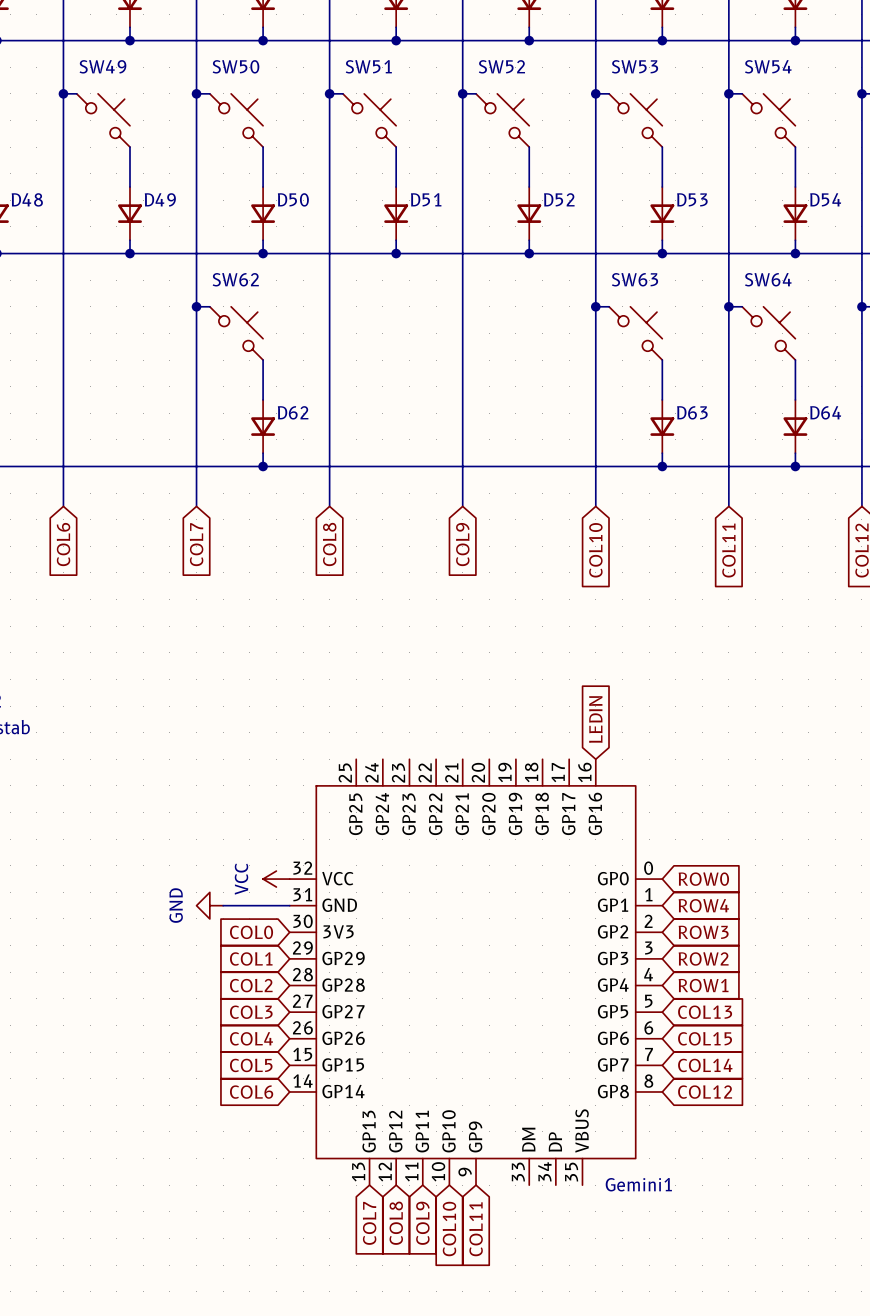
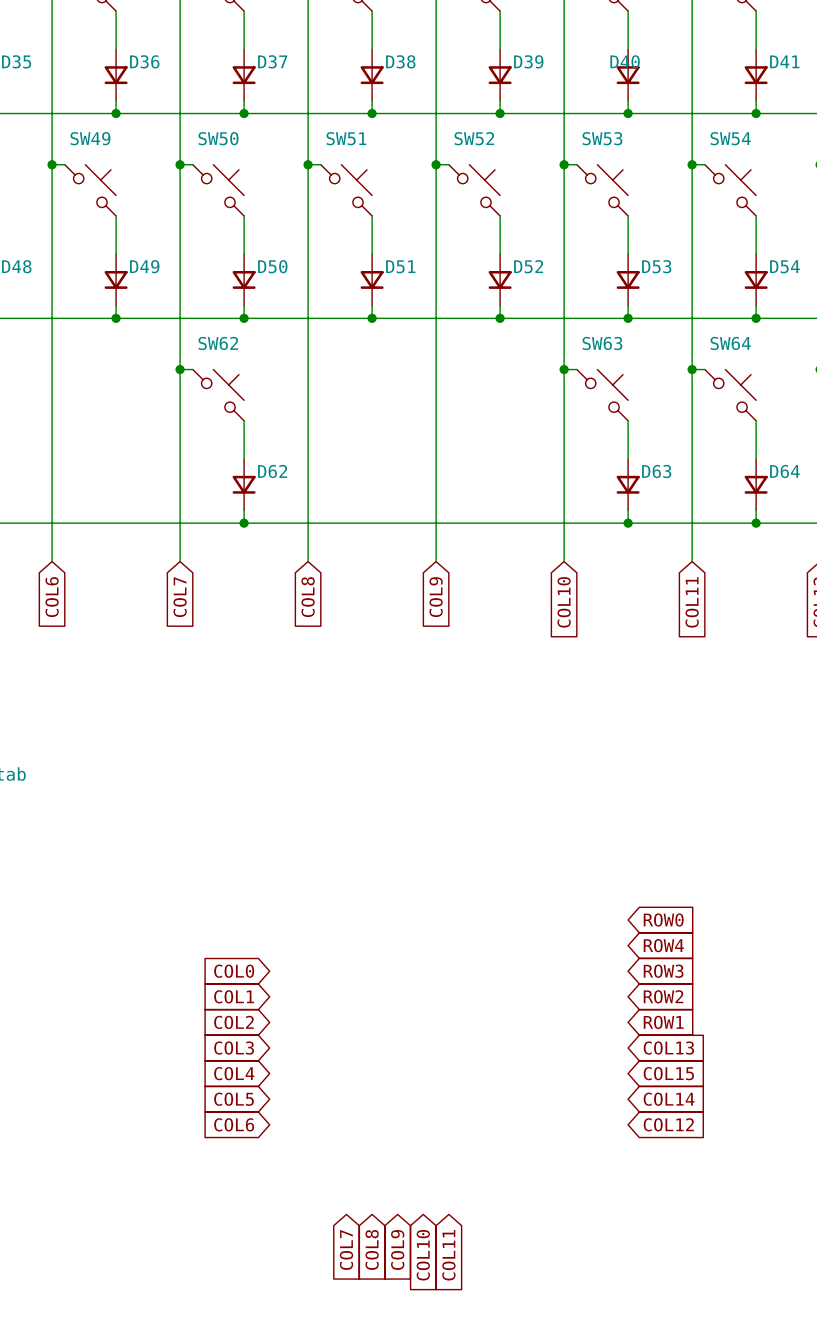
global label: LEDIN (595, 719) -> none
power symbol: VCC (276, 879) -> none
power symbol: GND (209, 905) -> none
wire: (223, 905) (289, 905) -> none
Gemini1: (476, 972) -> none

